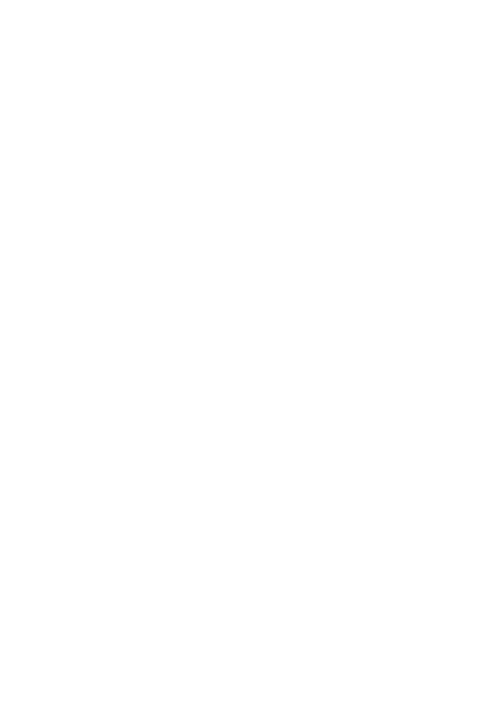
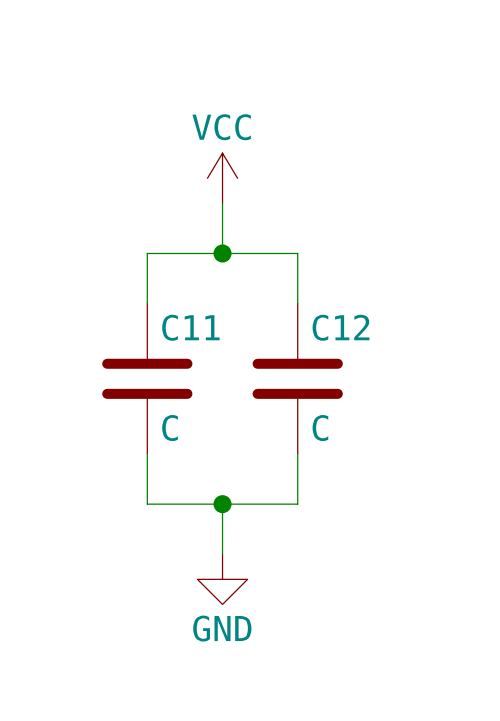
power symbol: none -> VCC (222, 178)
wire: none -> (222, 203) (222, 253)
junction: none -> (222, 253)
wire: none -> (147, 303) (147, 253) (297, 253) (297, 303)
C11: none -> C (147, 378)
C12: none -> C (297, 378)
wire: none -> (147, 454) (147, 504) (297, 504) (297, 454)
wire: none -> (222, 504) (222, 554)
junction: none -> (222, 504)
power symbol: none -> GND (222, 579)

